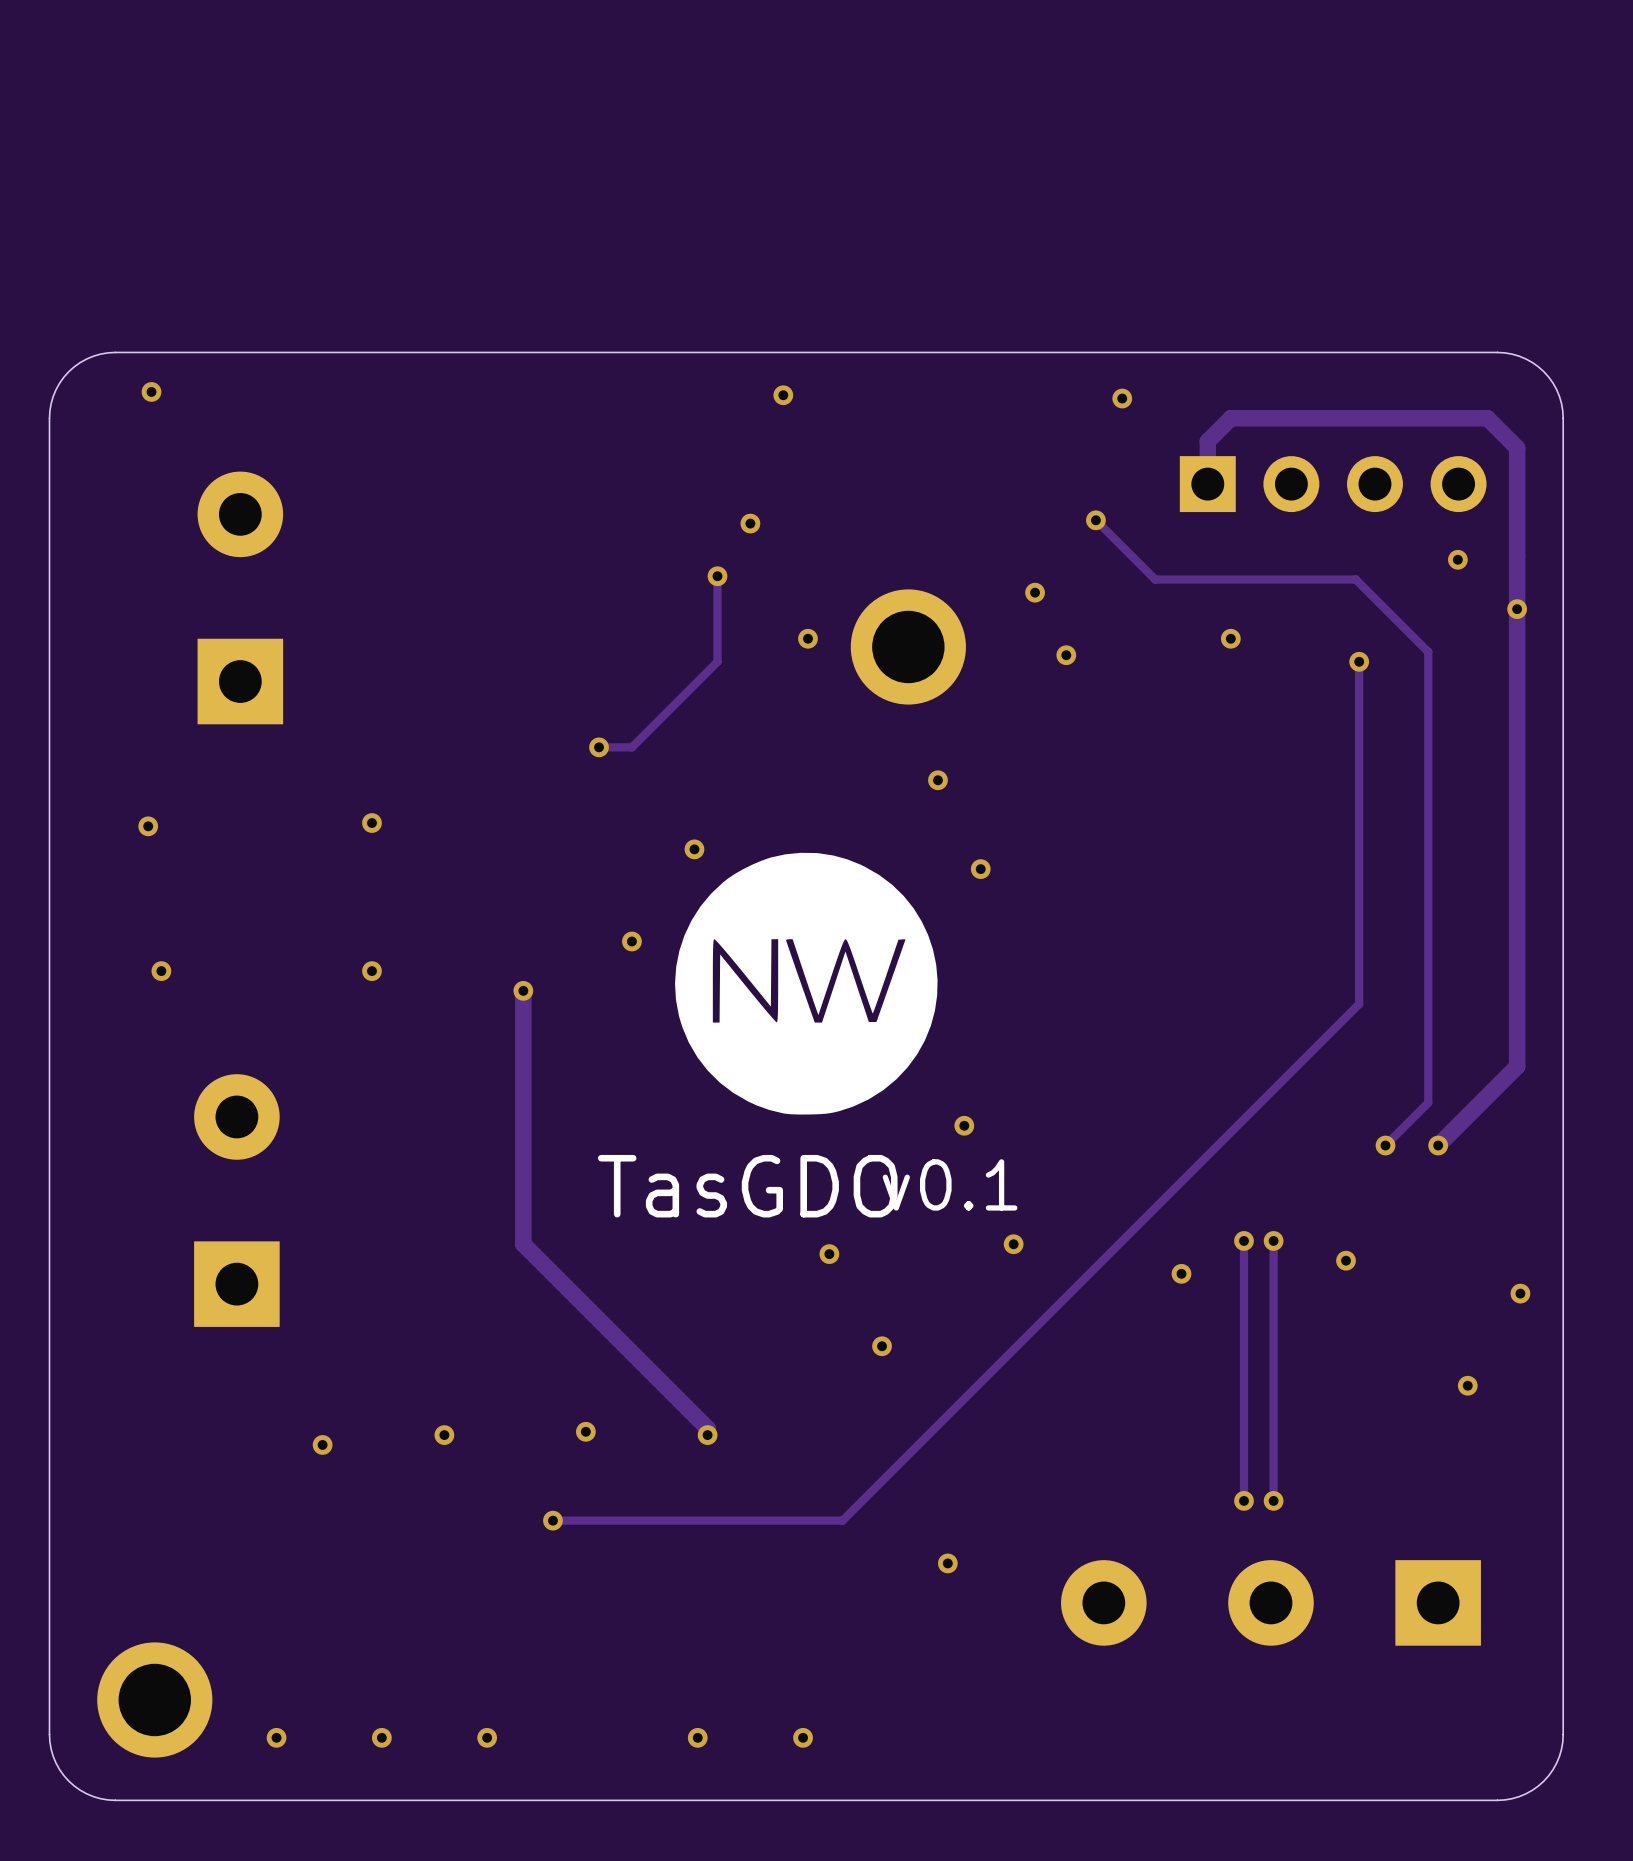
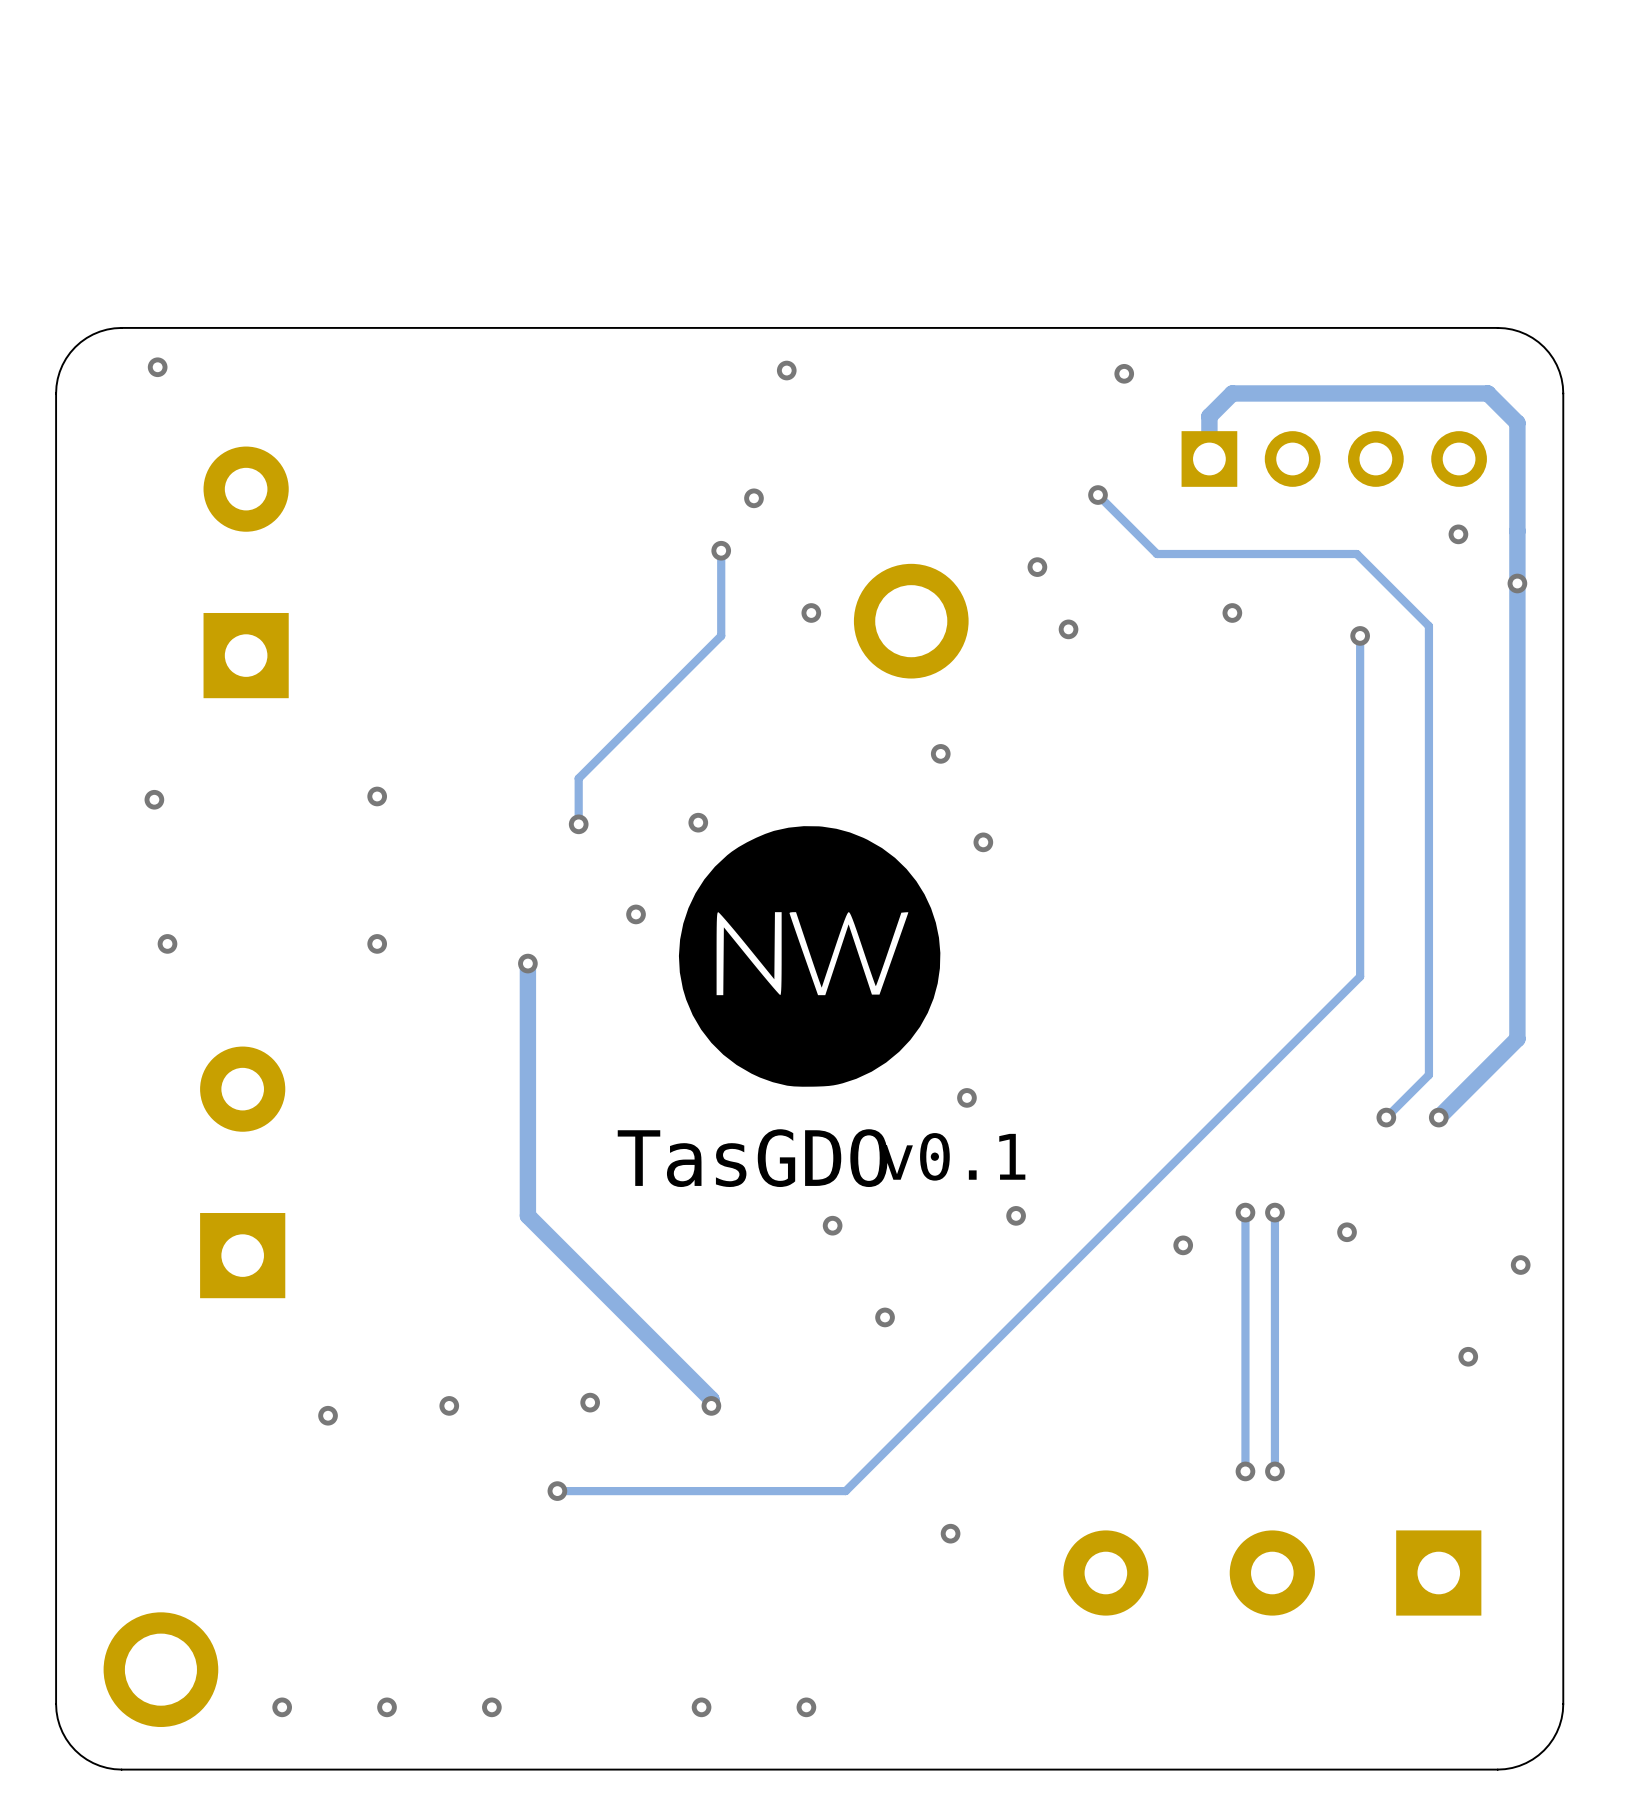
via position: (599, 747) -> (578, 824)
track: (631, 747) (599, 747) -> (636, 721) (578, 778) (578, 824)

